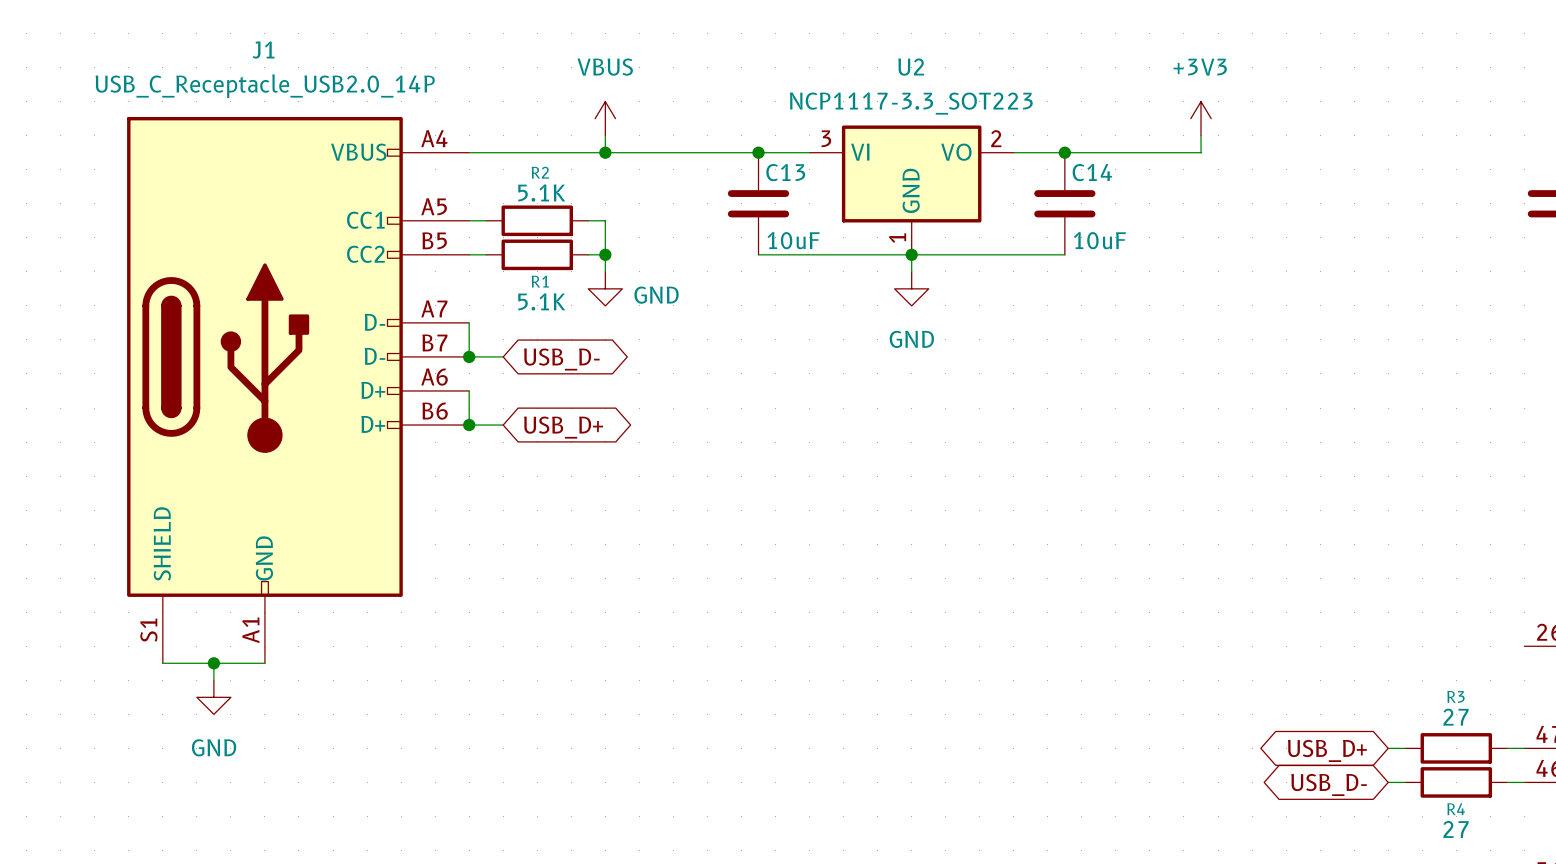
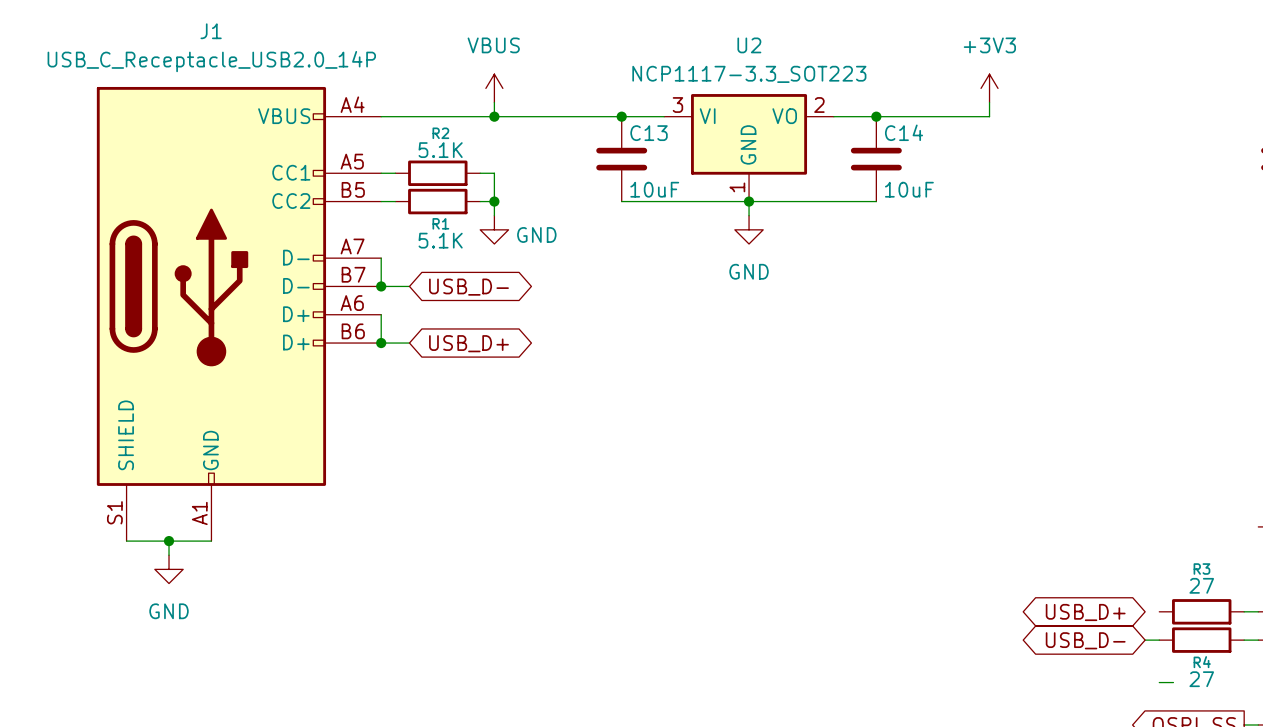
wire: (1388, 748) (1405, 748) -> (1159, 682) (1173, 682)

